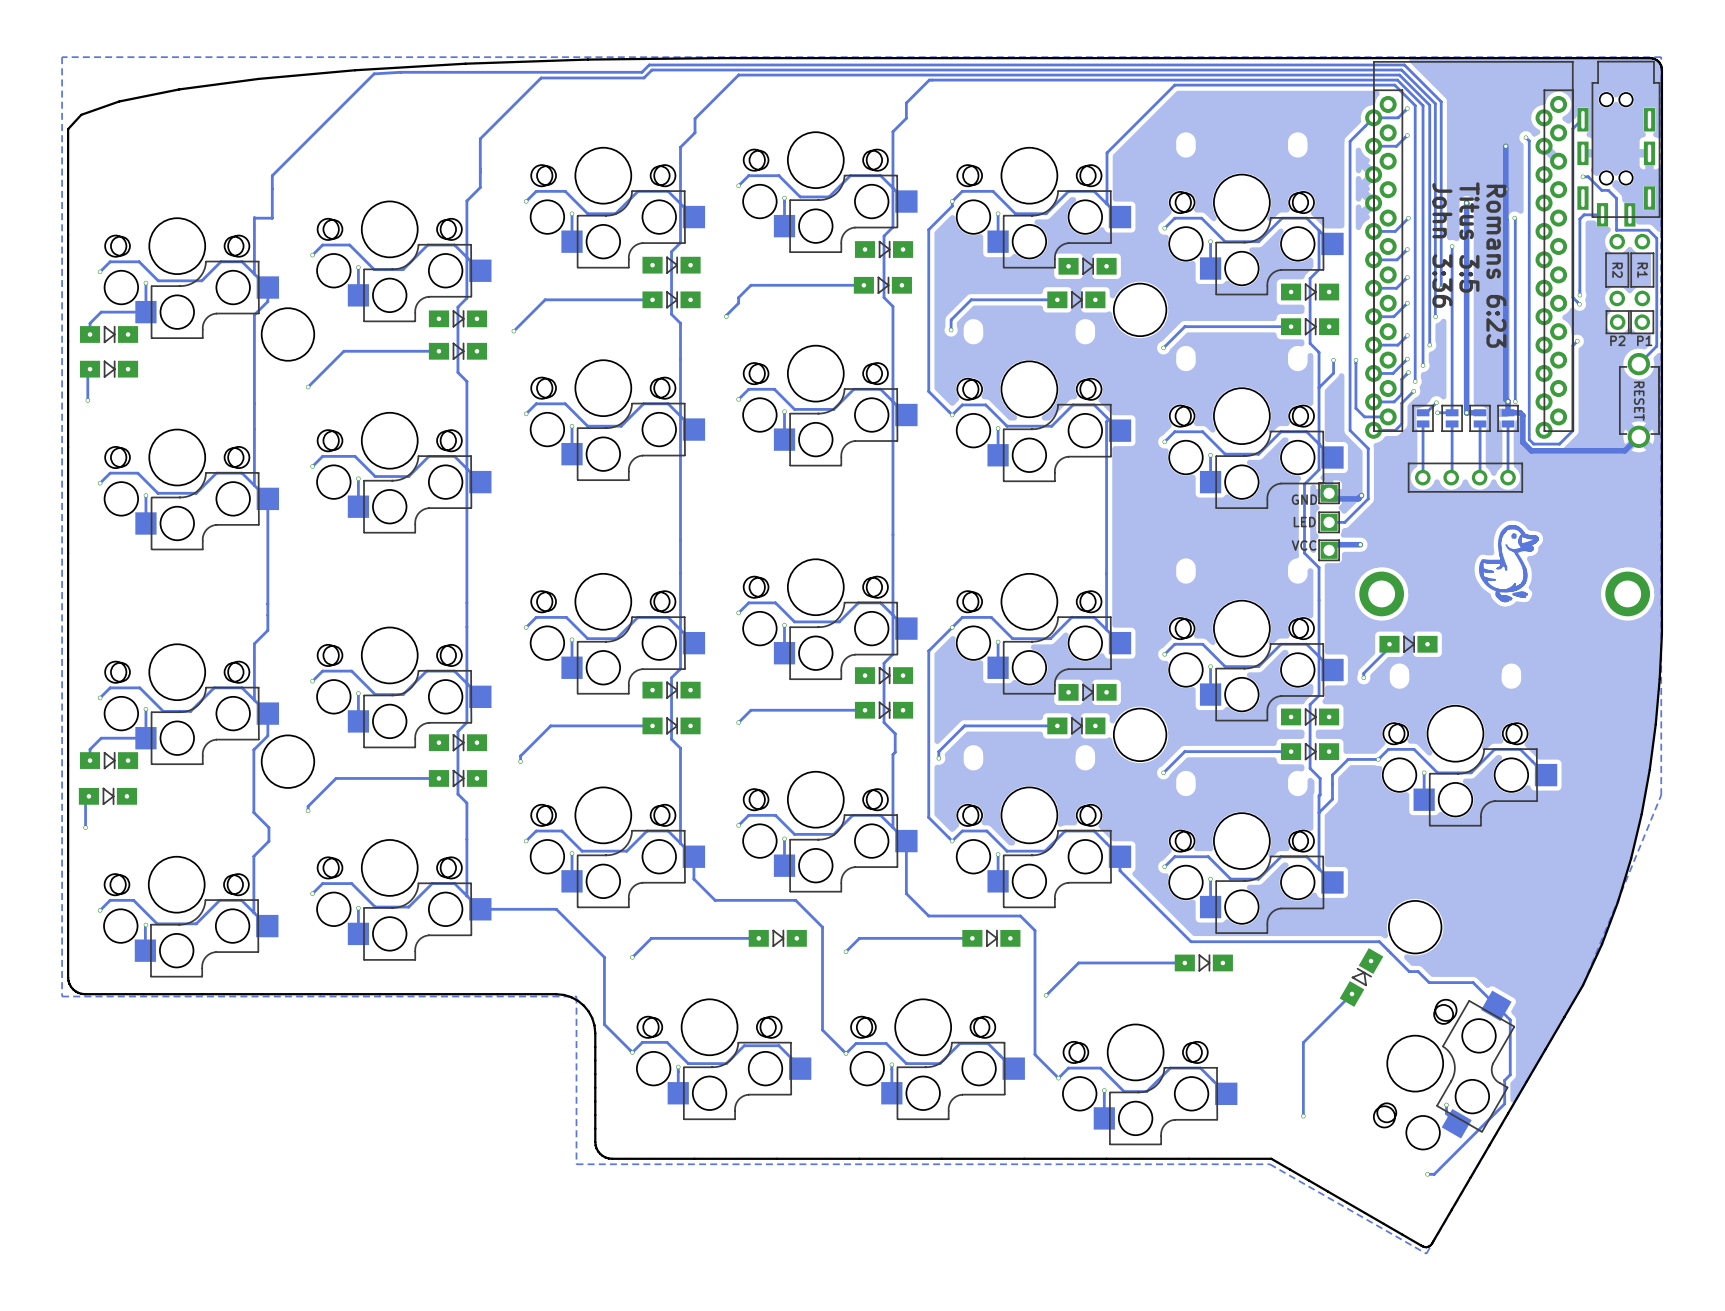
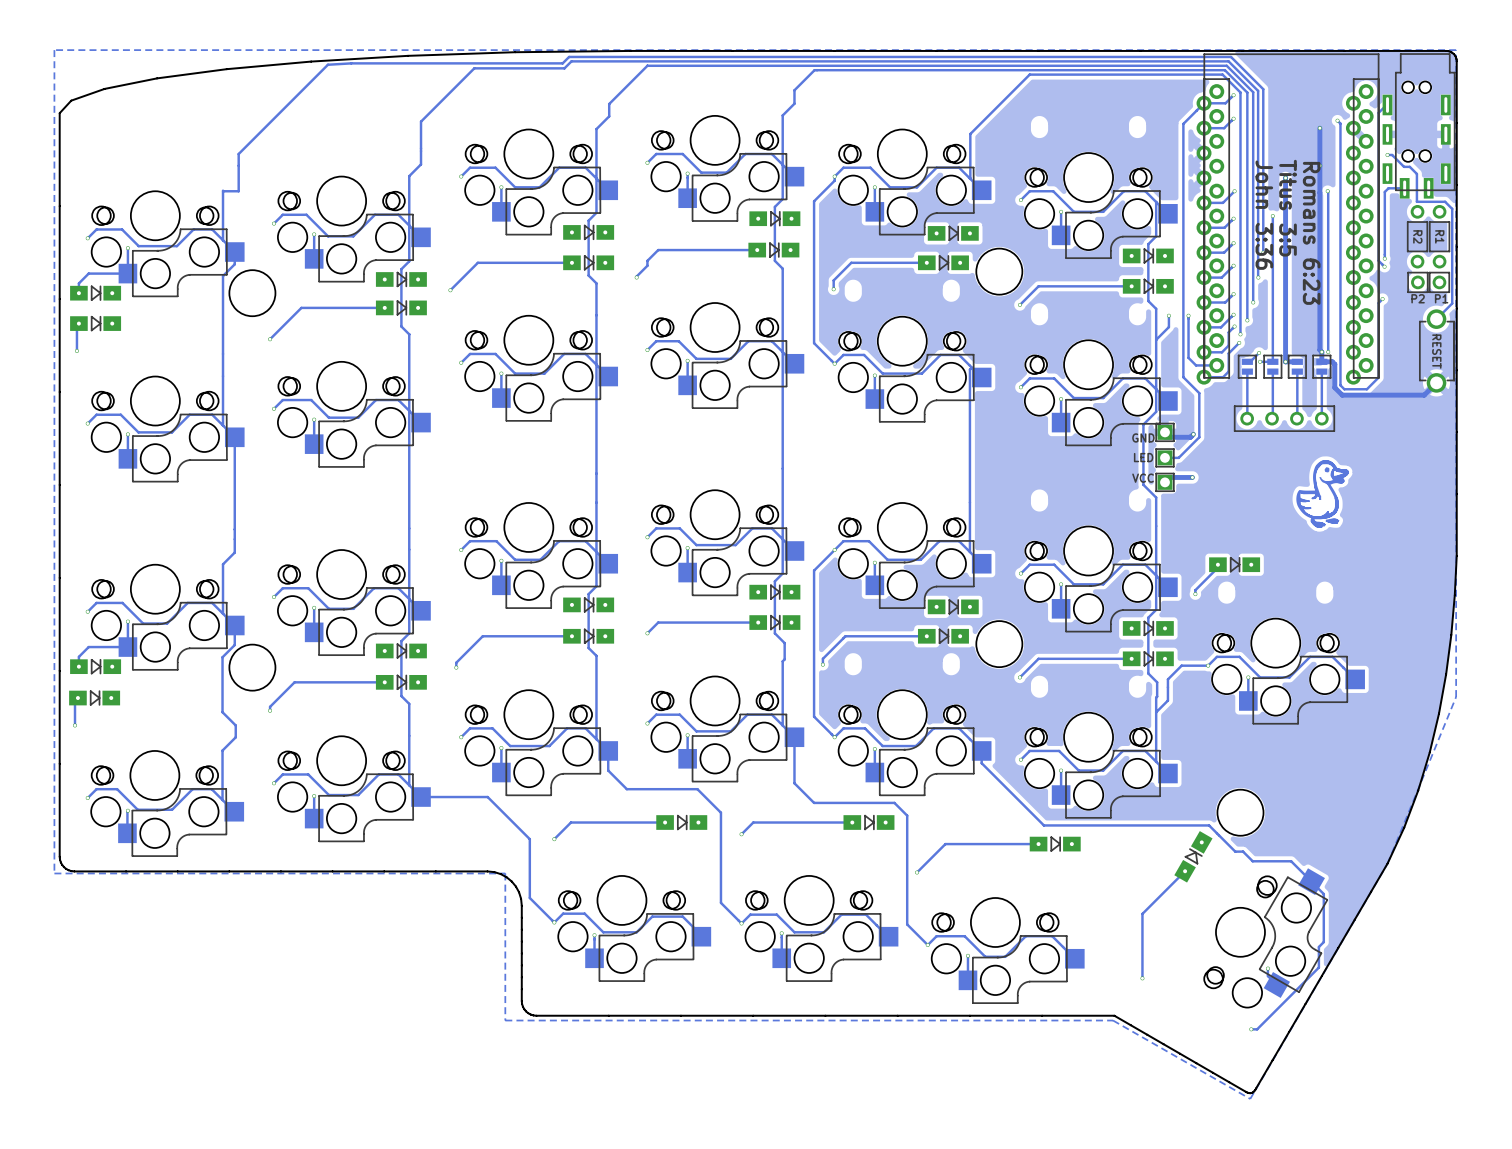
part: (1381, 593) -> none
part: (1627, 593) -> none

